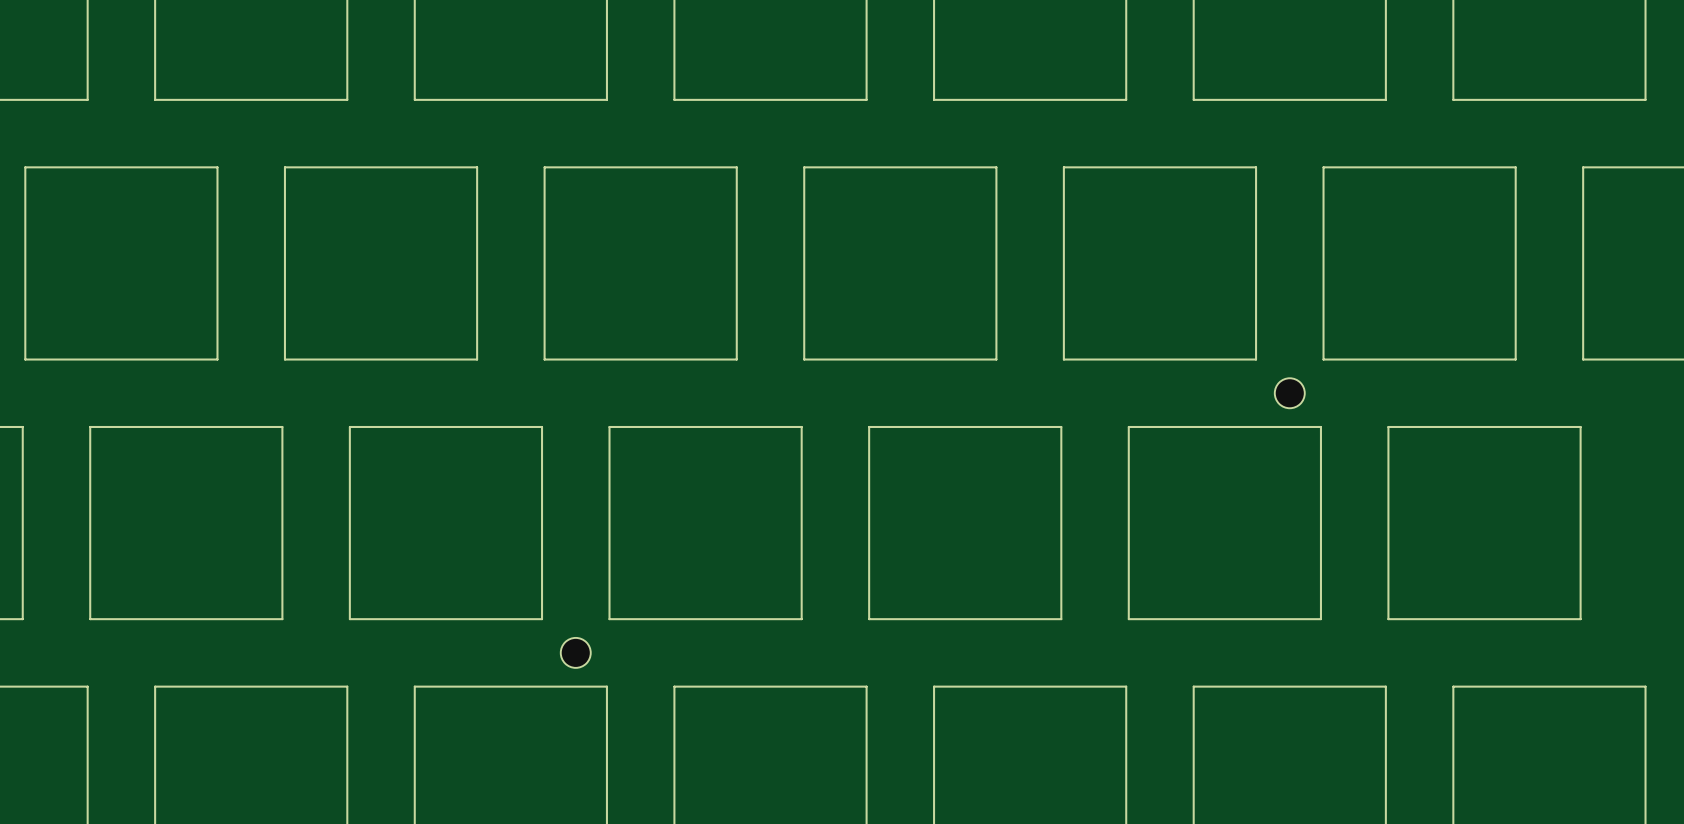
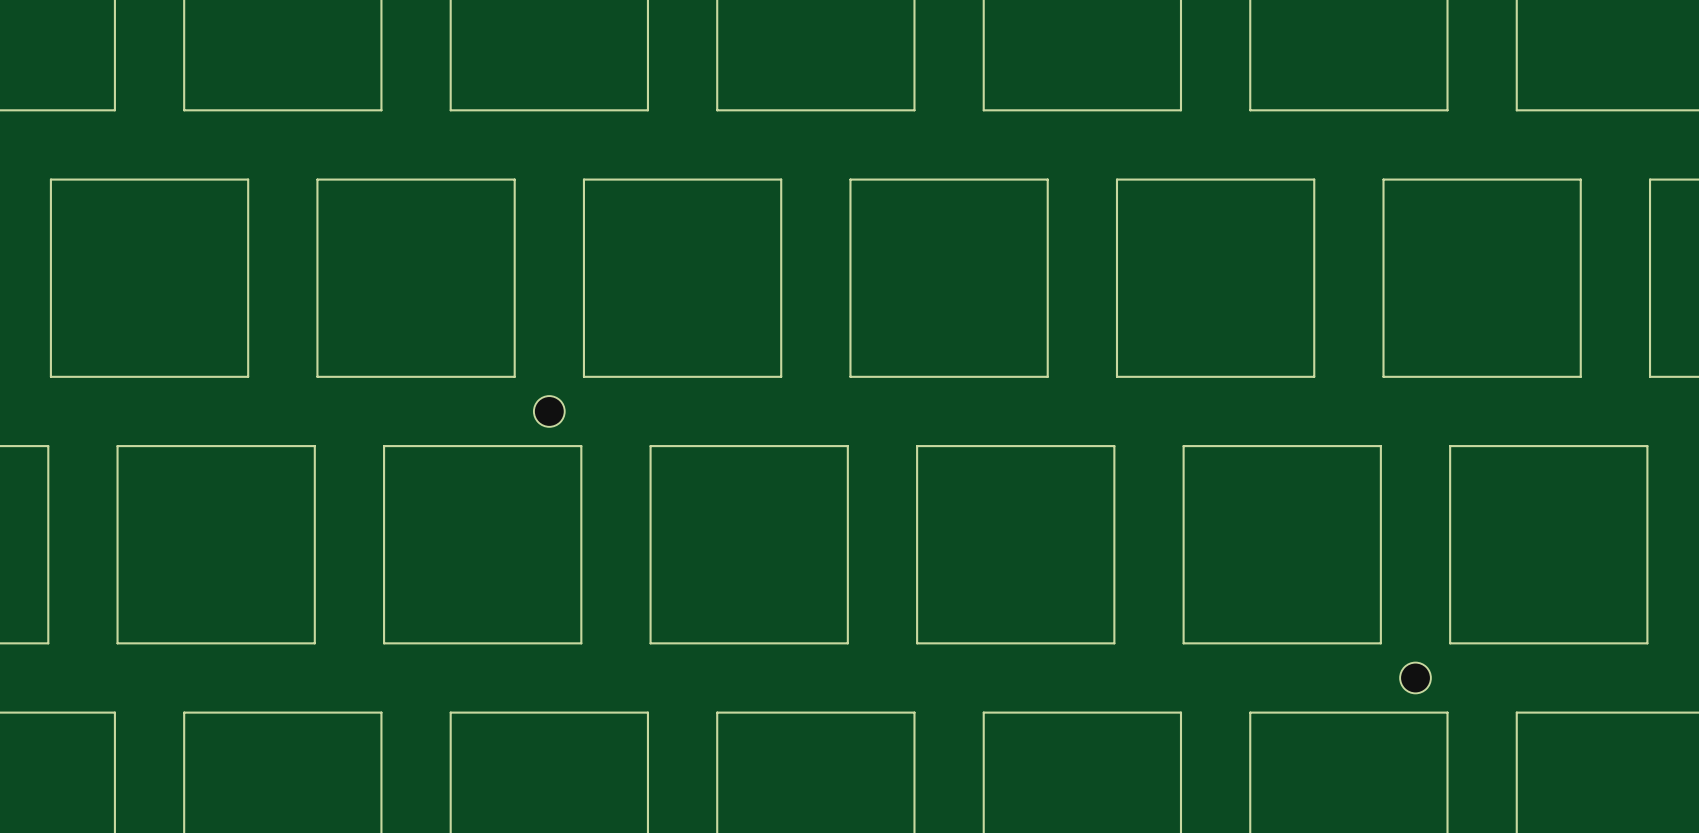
part position: (1289, 393) -> (1415, 677)
part position: (575, 652) -> (549, 411)

